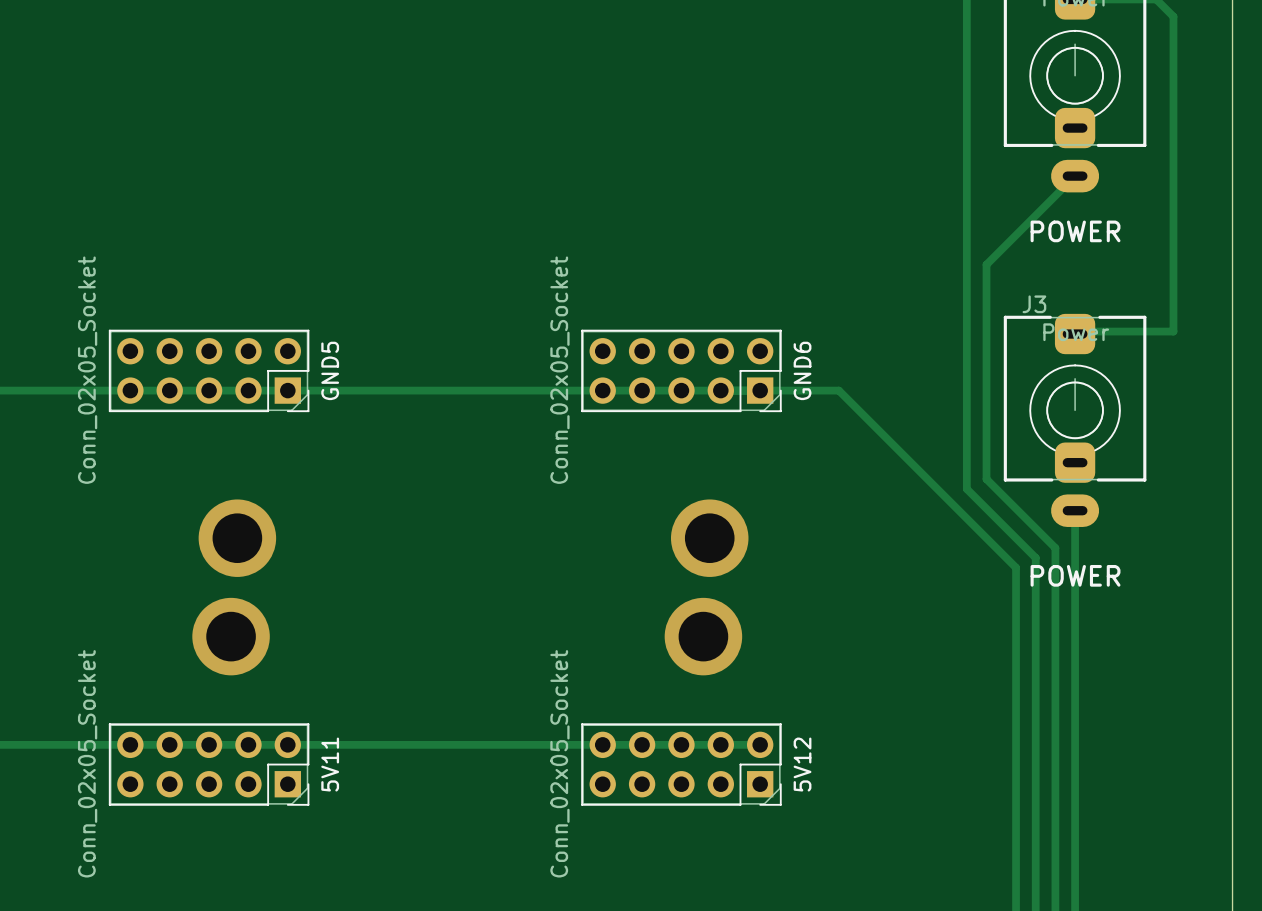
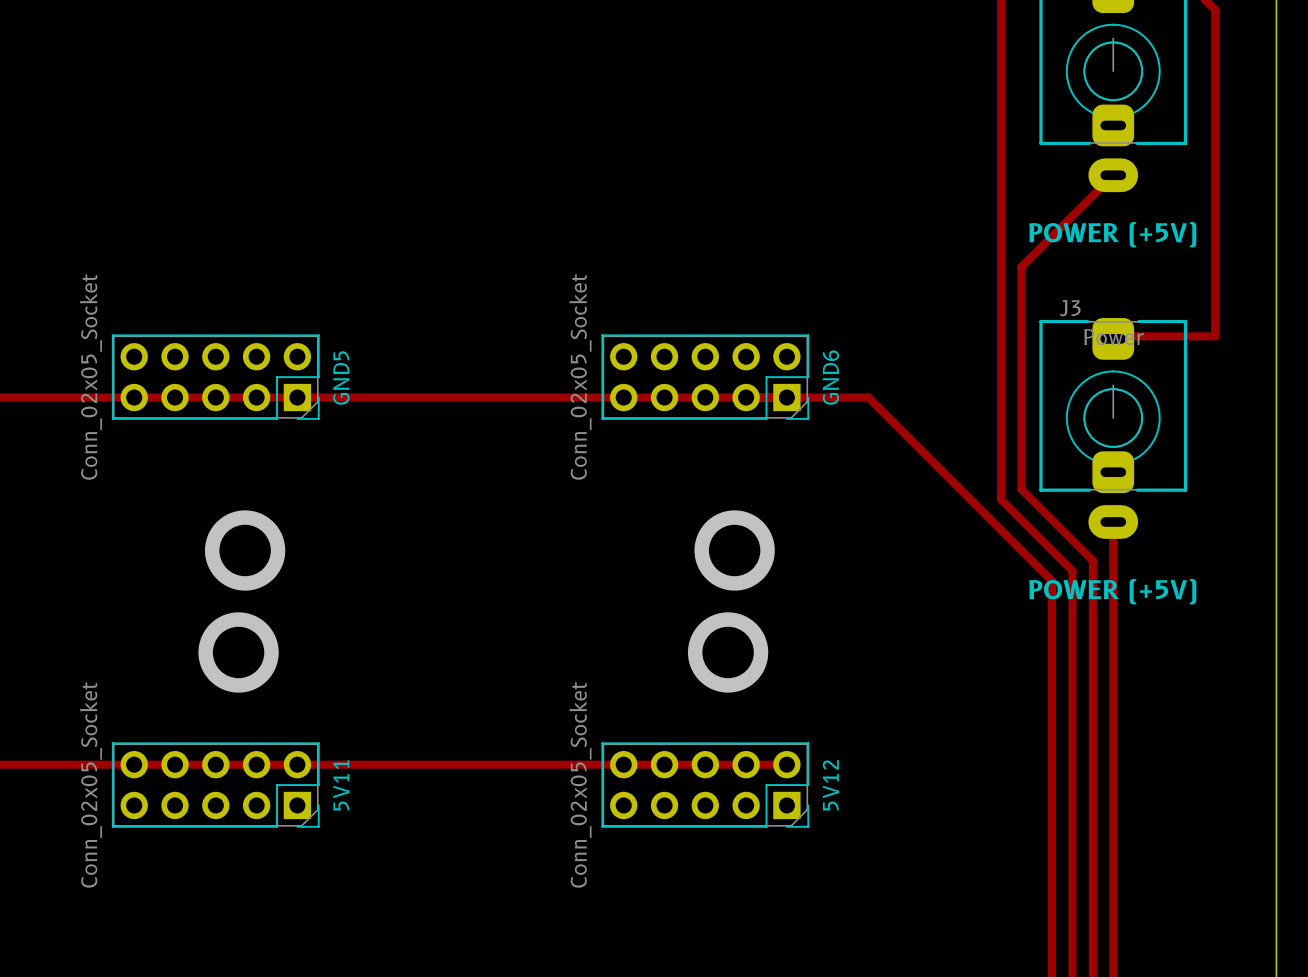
text: POWER (1075, 231) -> POWER (+5V) (1112, 234)
text: POWER (1075, 575) -> POWER (+5V) (1112, 591)

